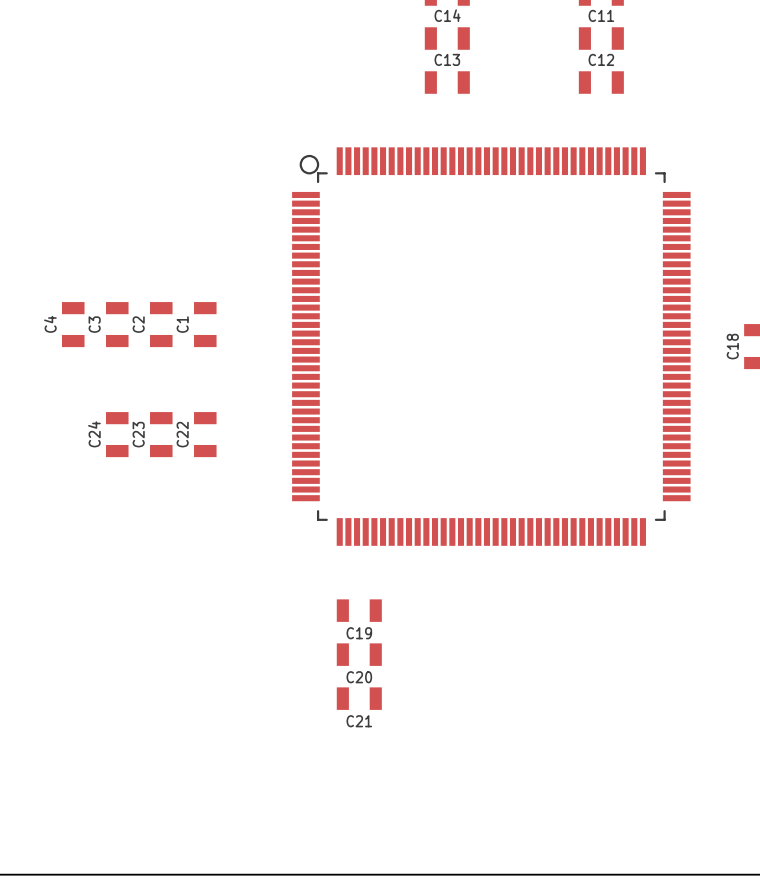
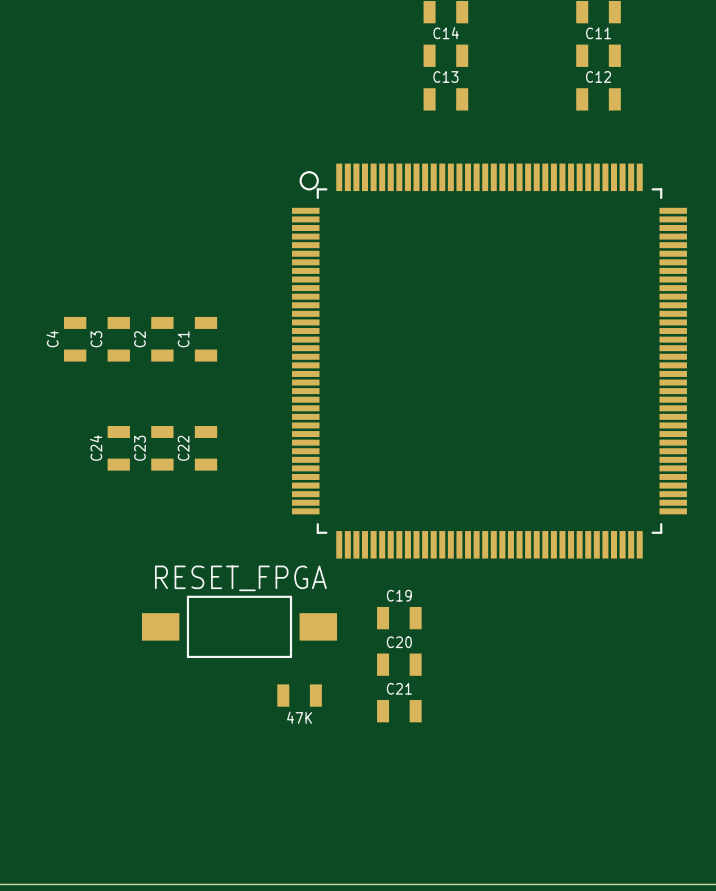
C19 position: (359, 610) -> (399, 618)
RESET_FPGA: none -> (239, 626)
C19 name position: C19 (359, 633) -> C19 (399, 595)
C20 position: (359, 654) -> (399, 664)
C20 name position: C20 (359, 677) -> C20 (399, 642)
47K: none -> (299, 695)
C21 position: (359, 698) -> (399, 711)
C21 name position: C21 (359, 721) -> C21 (399, 688)

